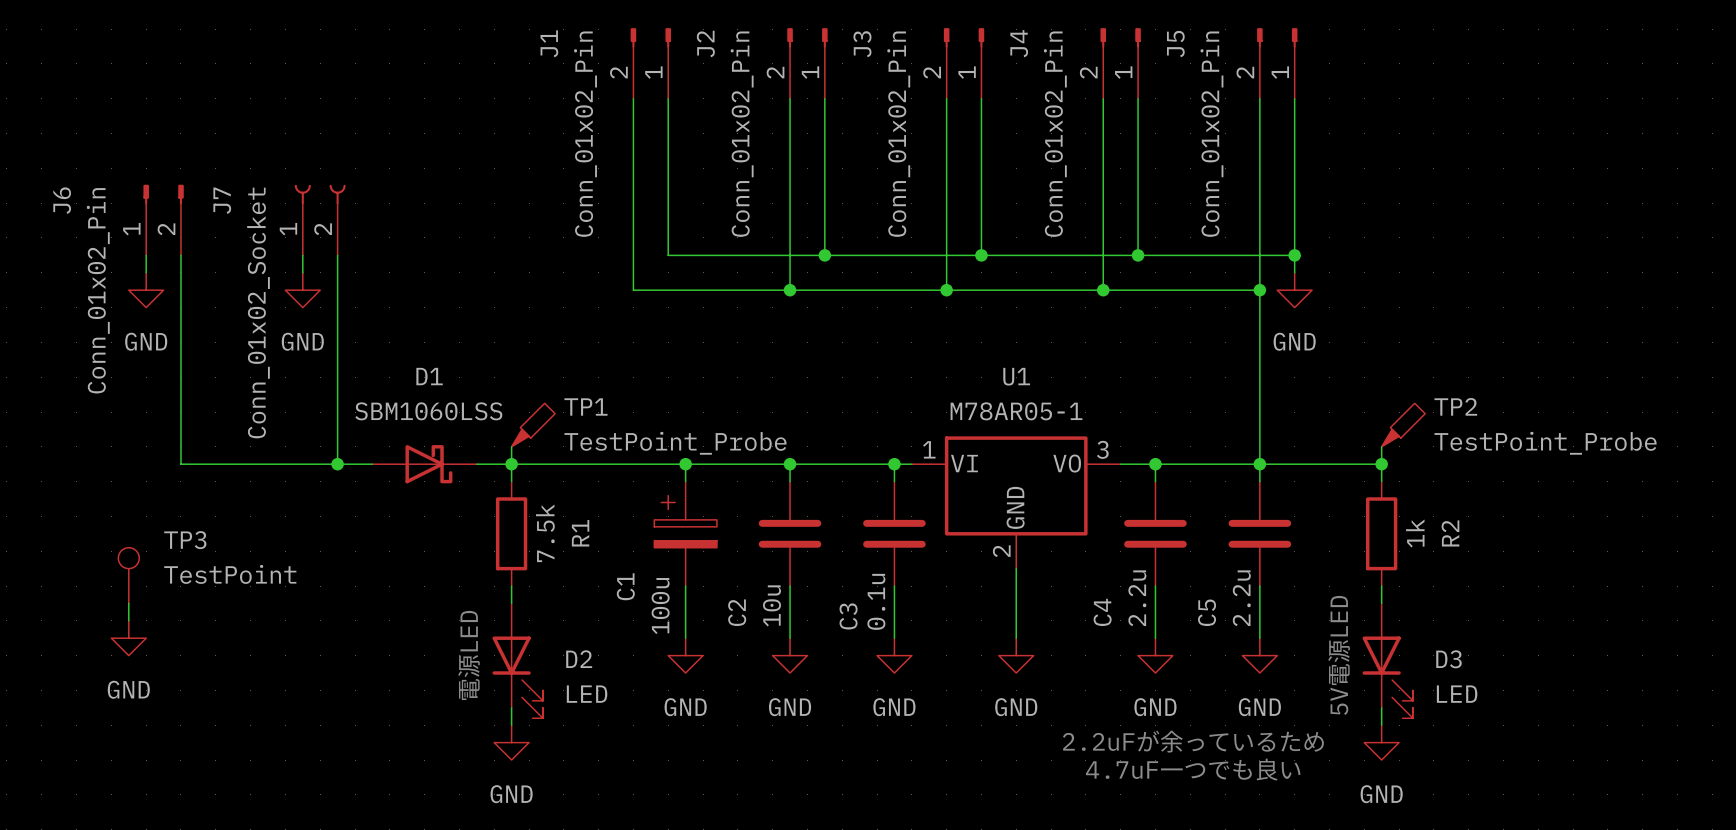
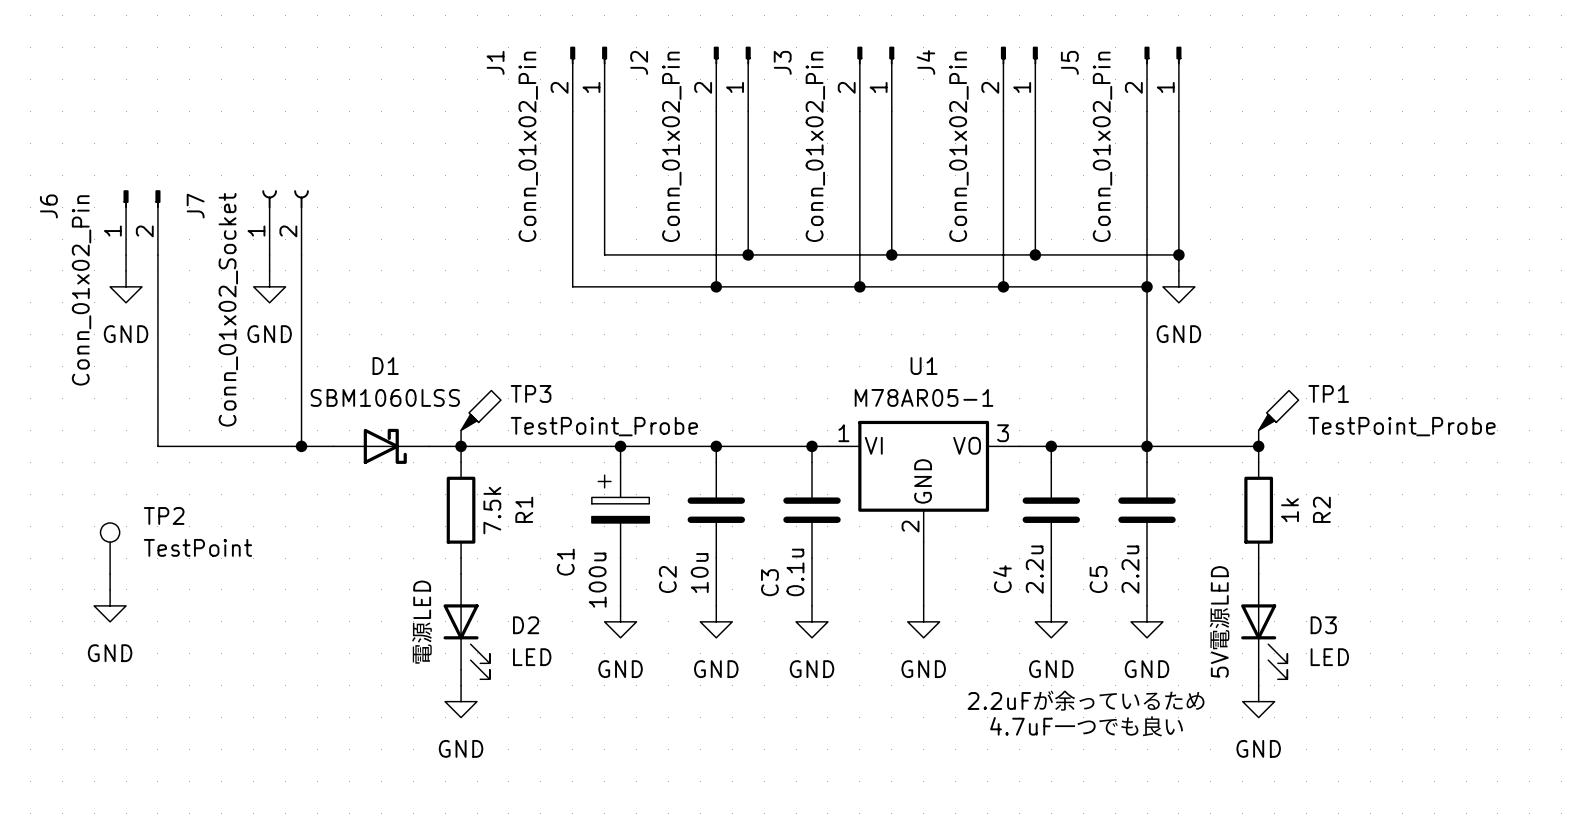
TP1 name: TP1 (585, 406) -> TP3 (531, 393)
TP2 name: TP2 (1455, 406) -> TP1 (1328, 393)
TP3 name: TP3 (185, 540) -> TP2 (164, 515)

